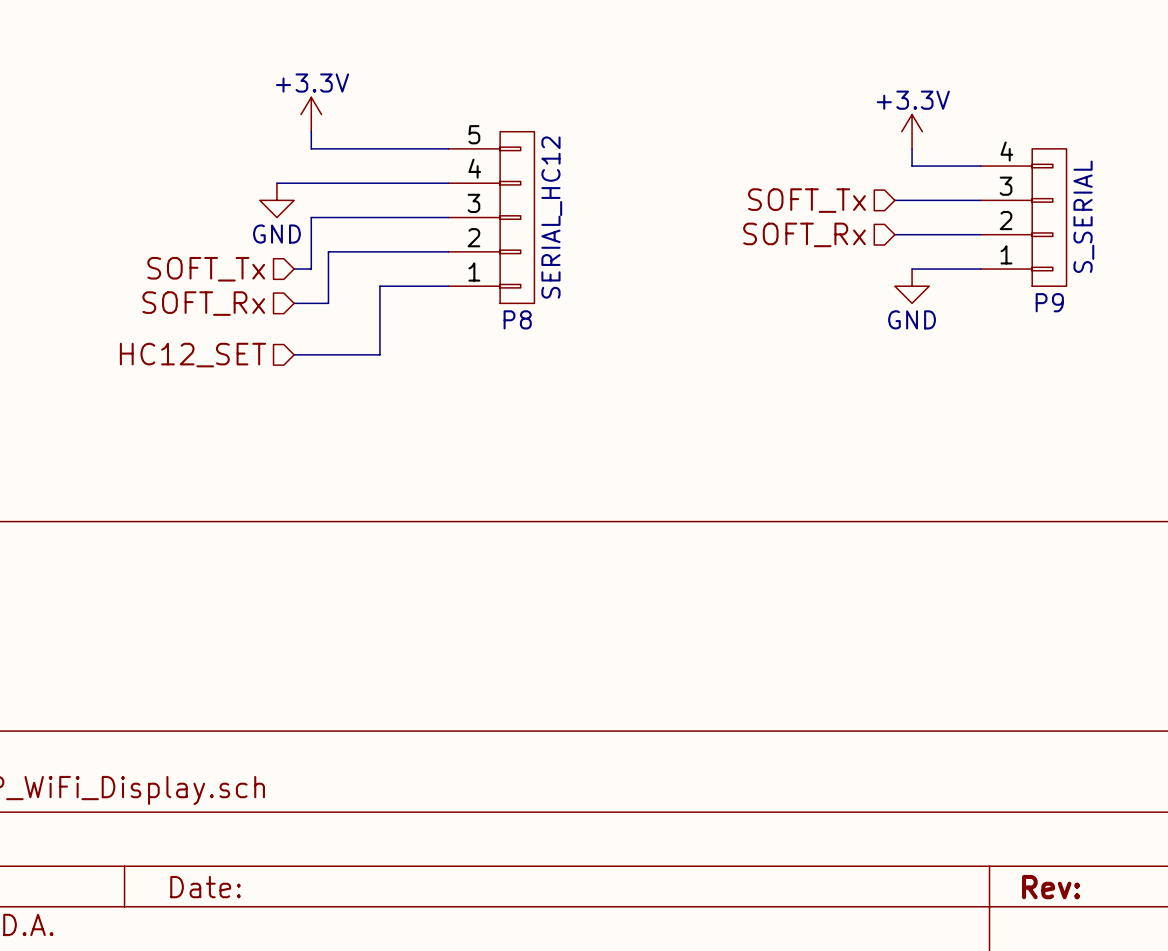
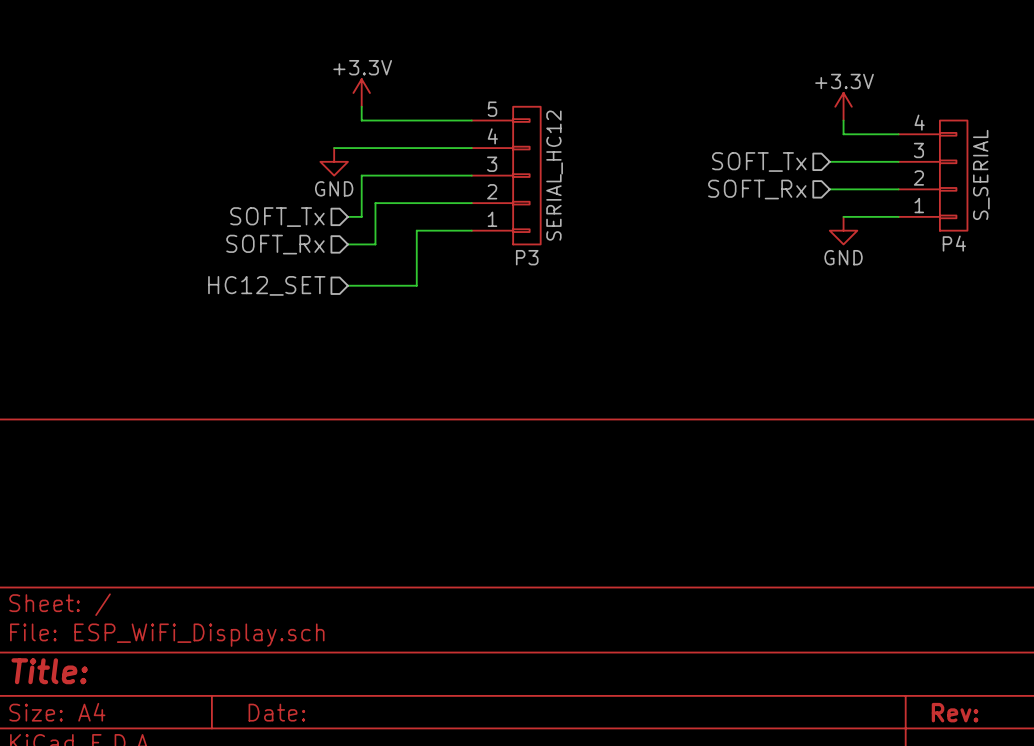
P9 name: P9 (1049, 302) -> P4 (954, 243)
P8 name: P8 (517, 319) -> P3 (527, 257)

